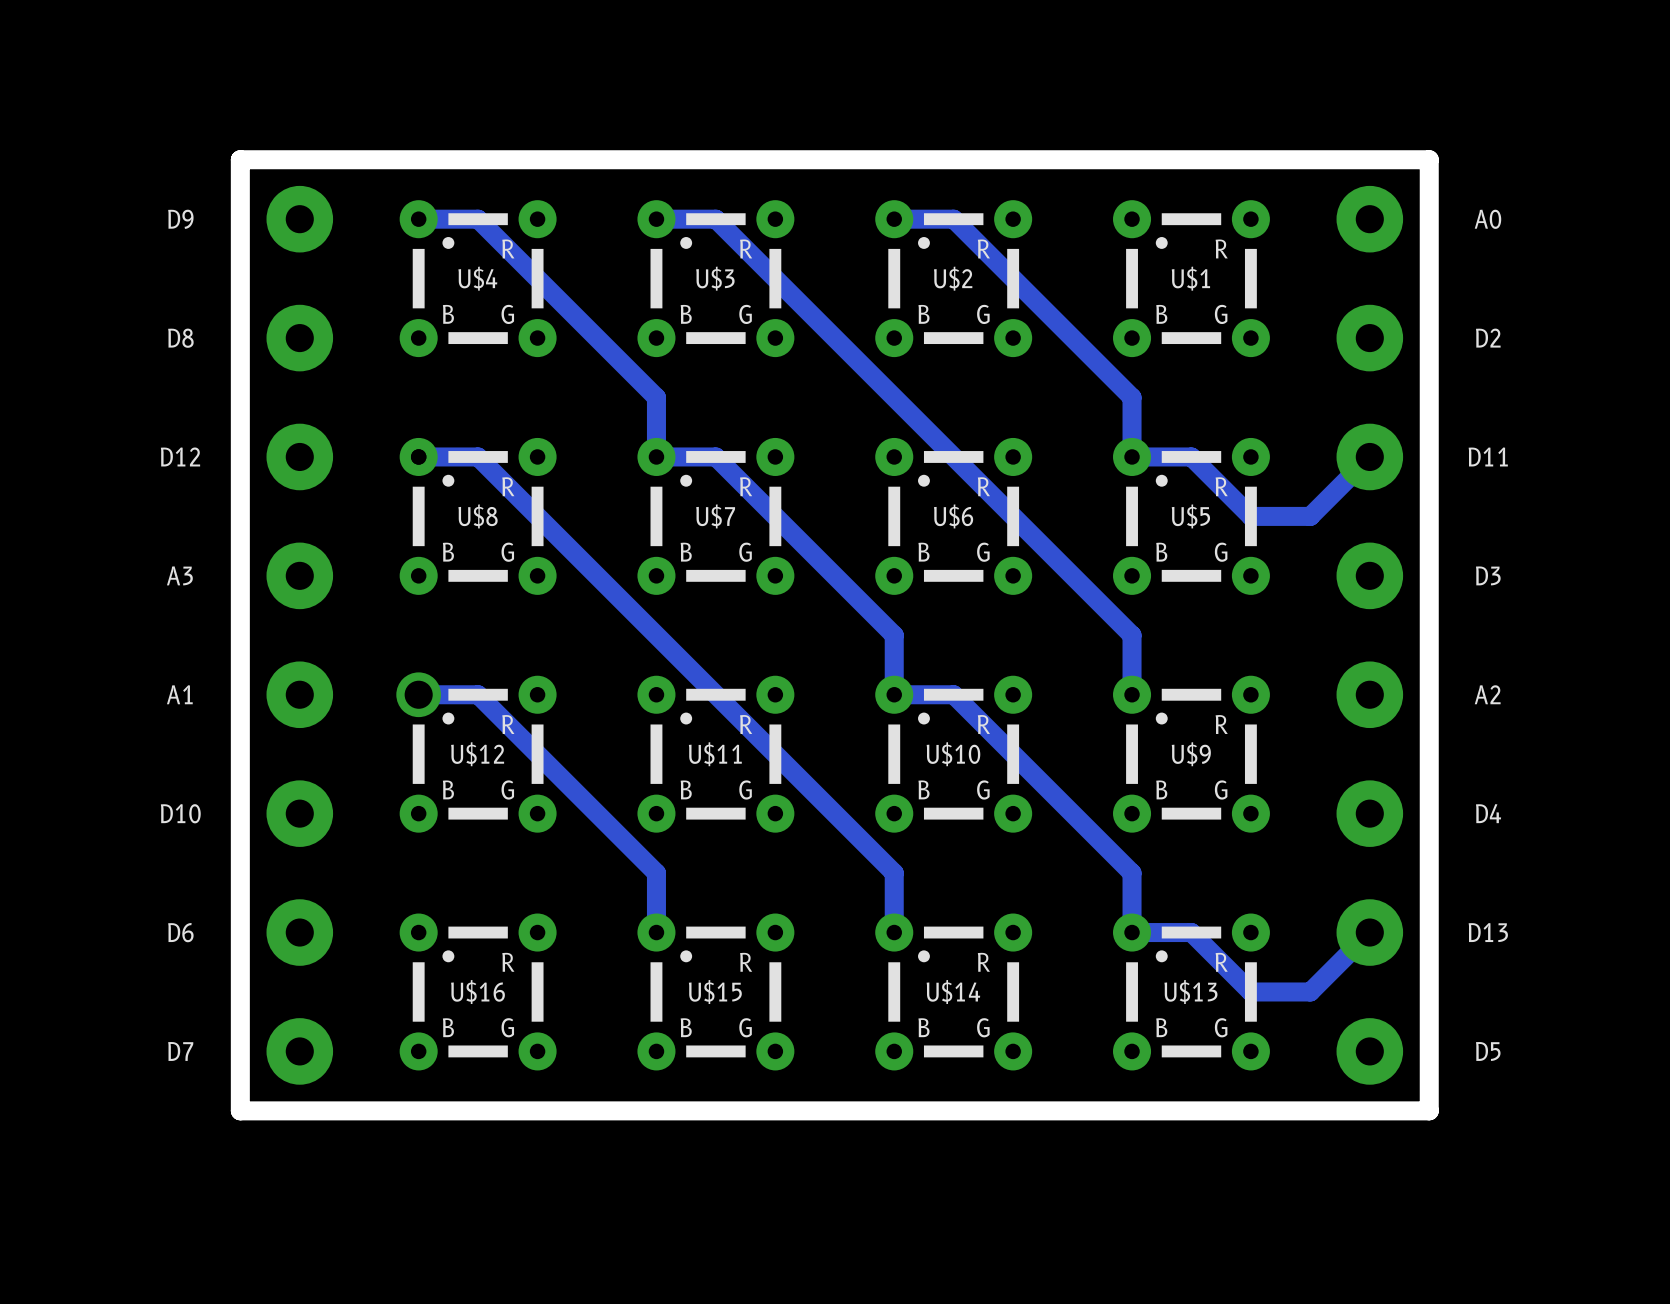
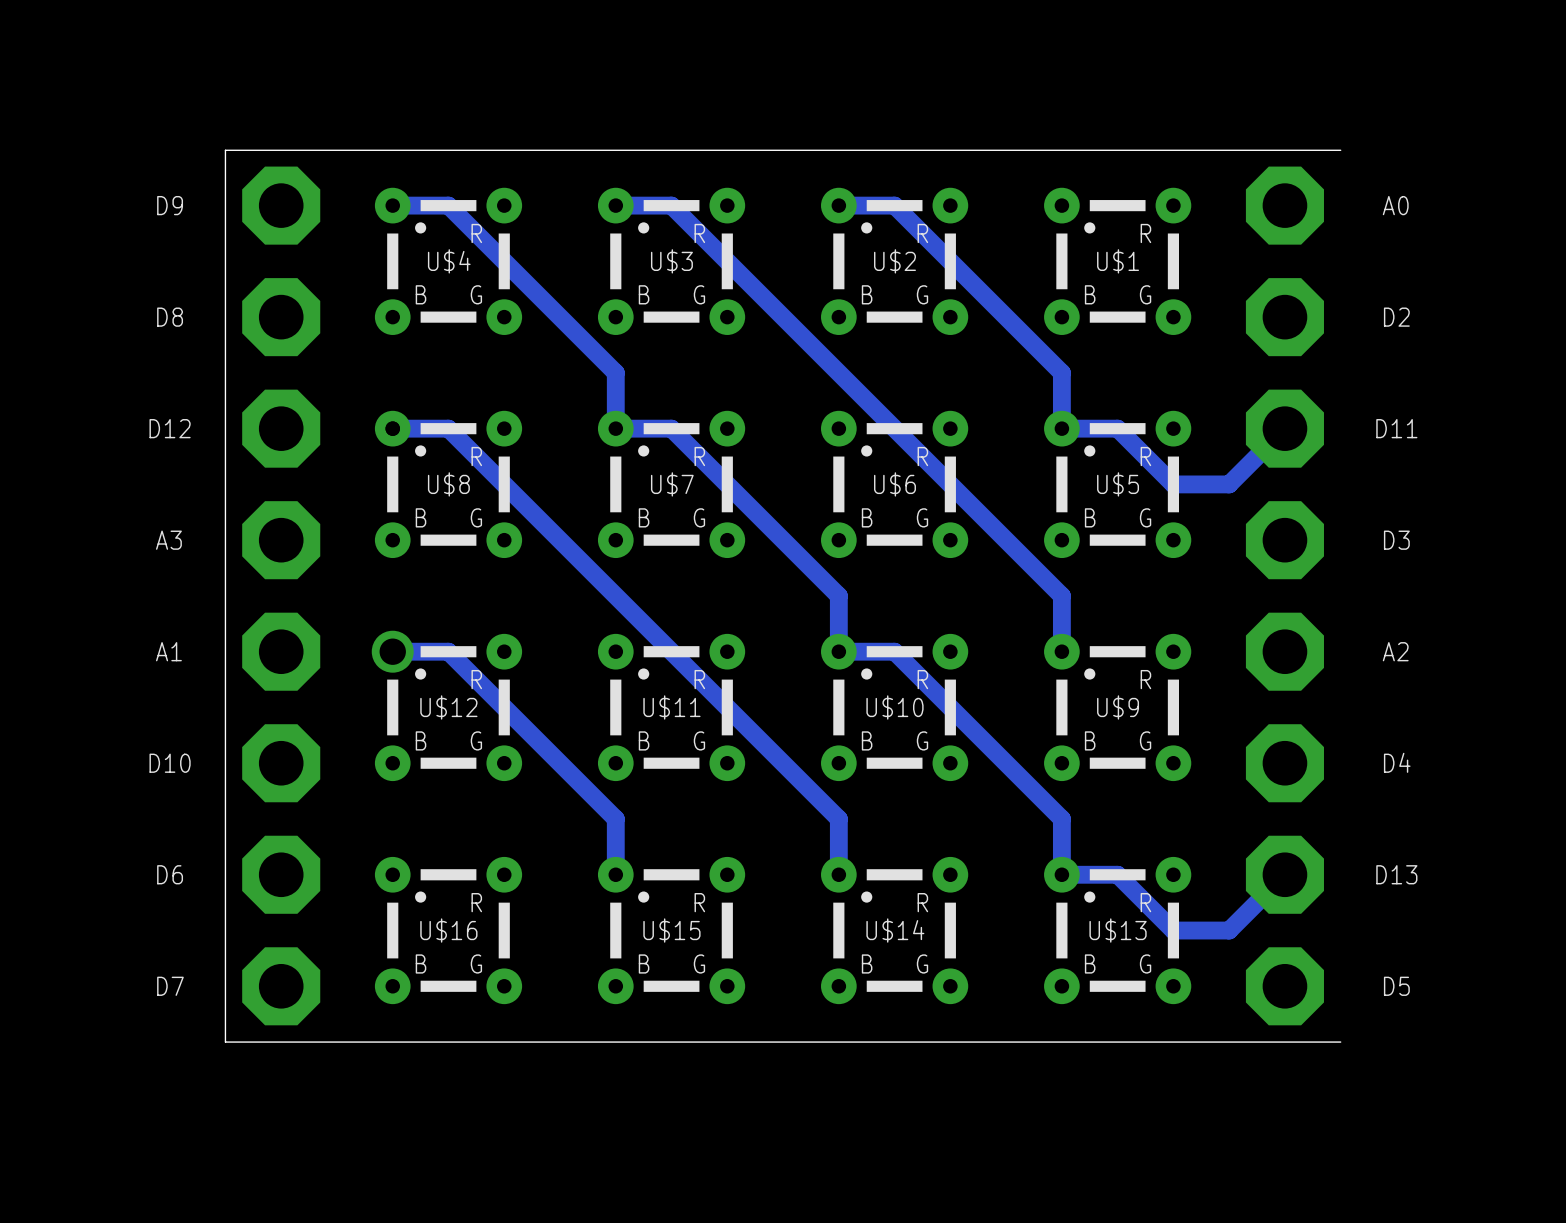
part footprint: [266, 185, 334, 1085] -> [242, 166, 321, 1026]
part footprint: [1336, 185, 1404, 1085] -> [1245, 166, 1324, 1026]
board edge: (1429, 1110) (1429, 159) (240, 159) (240, 1110) -> none
board edge width: thick (1429, 1110) (240, 1110) -> thin (1340, 1042) (225, 1042)

